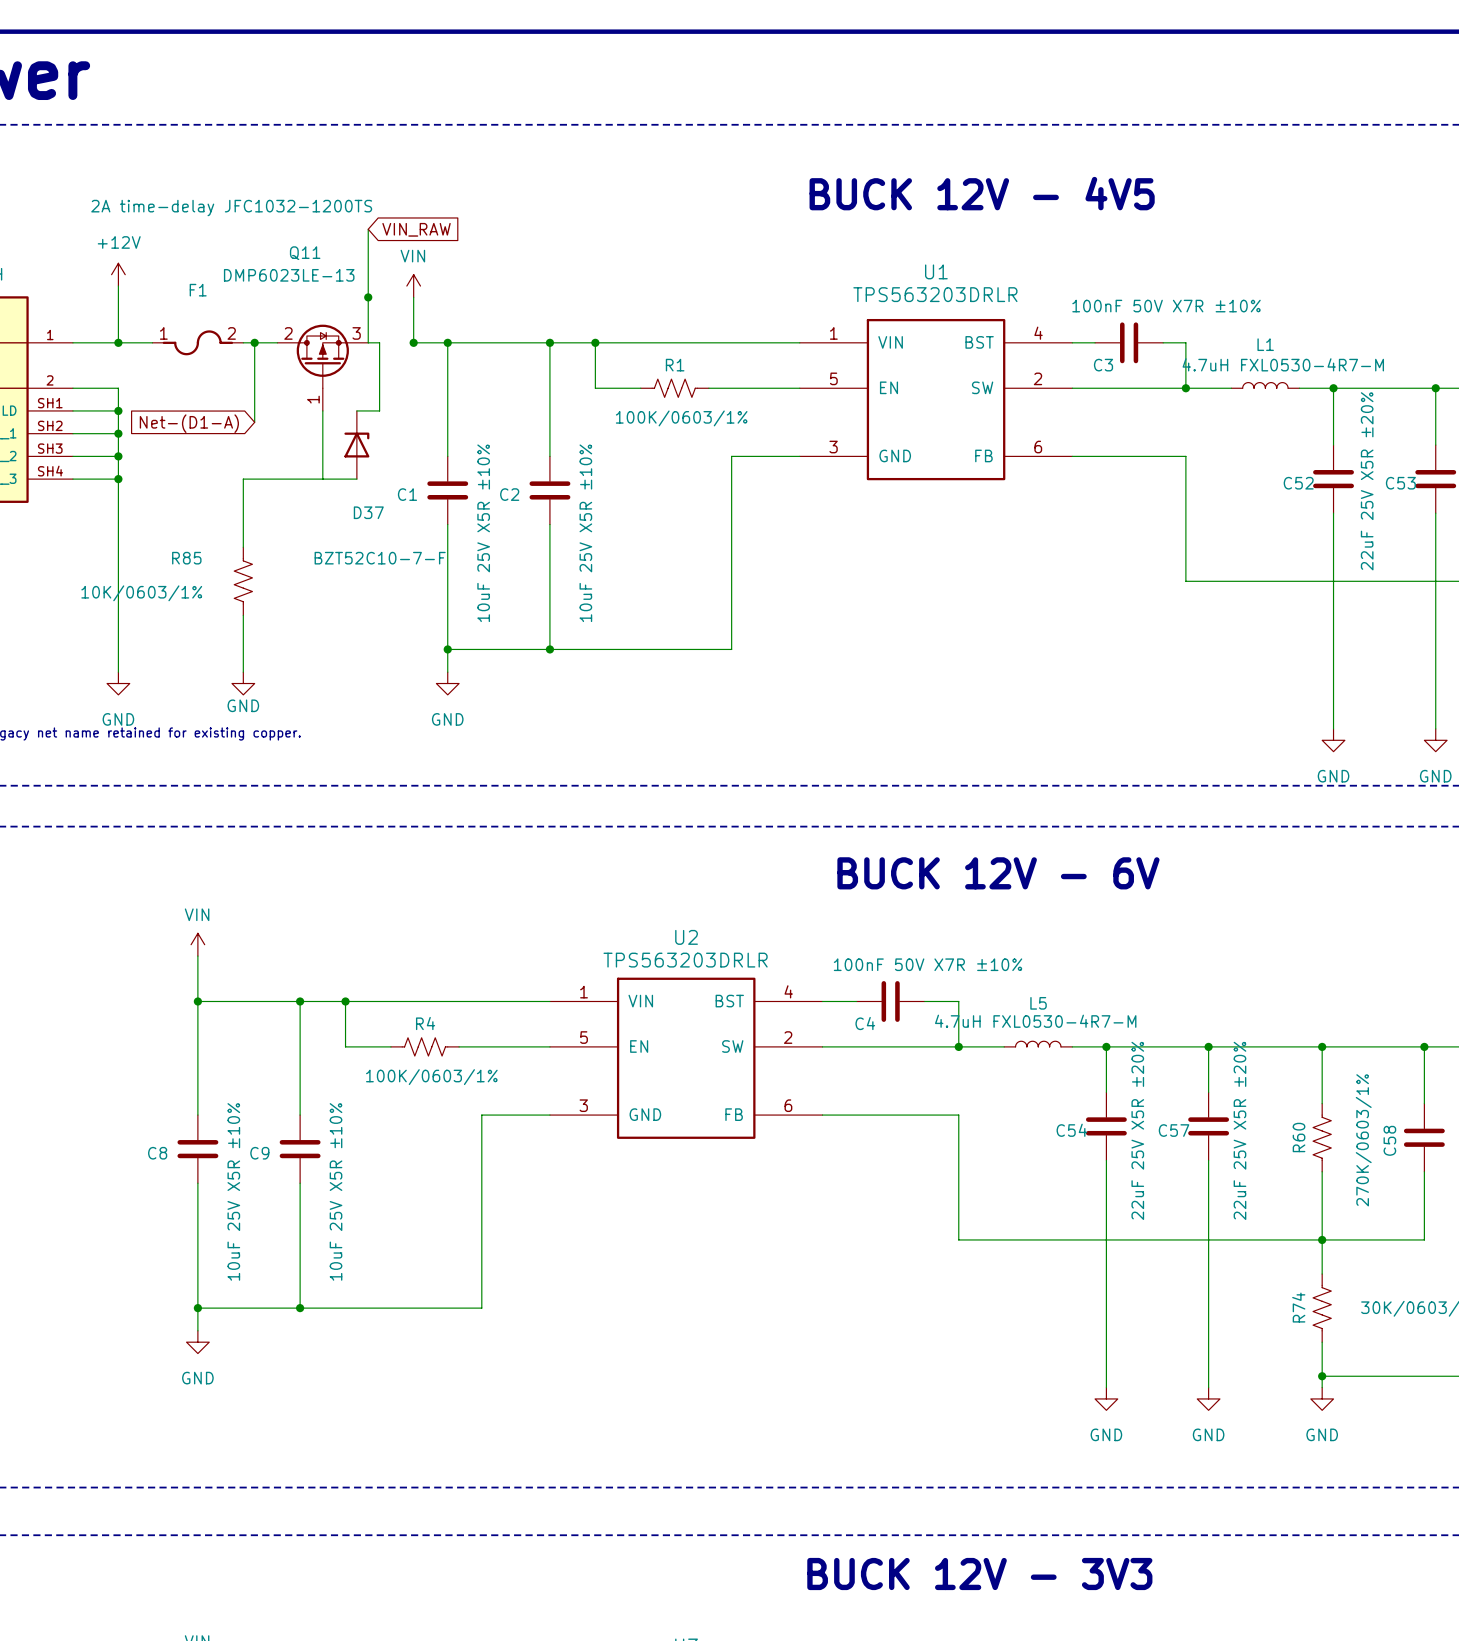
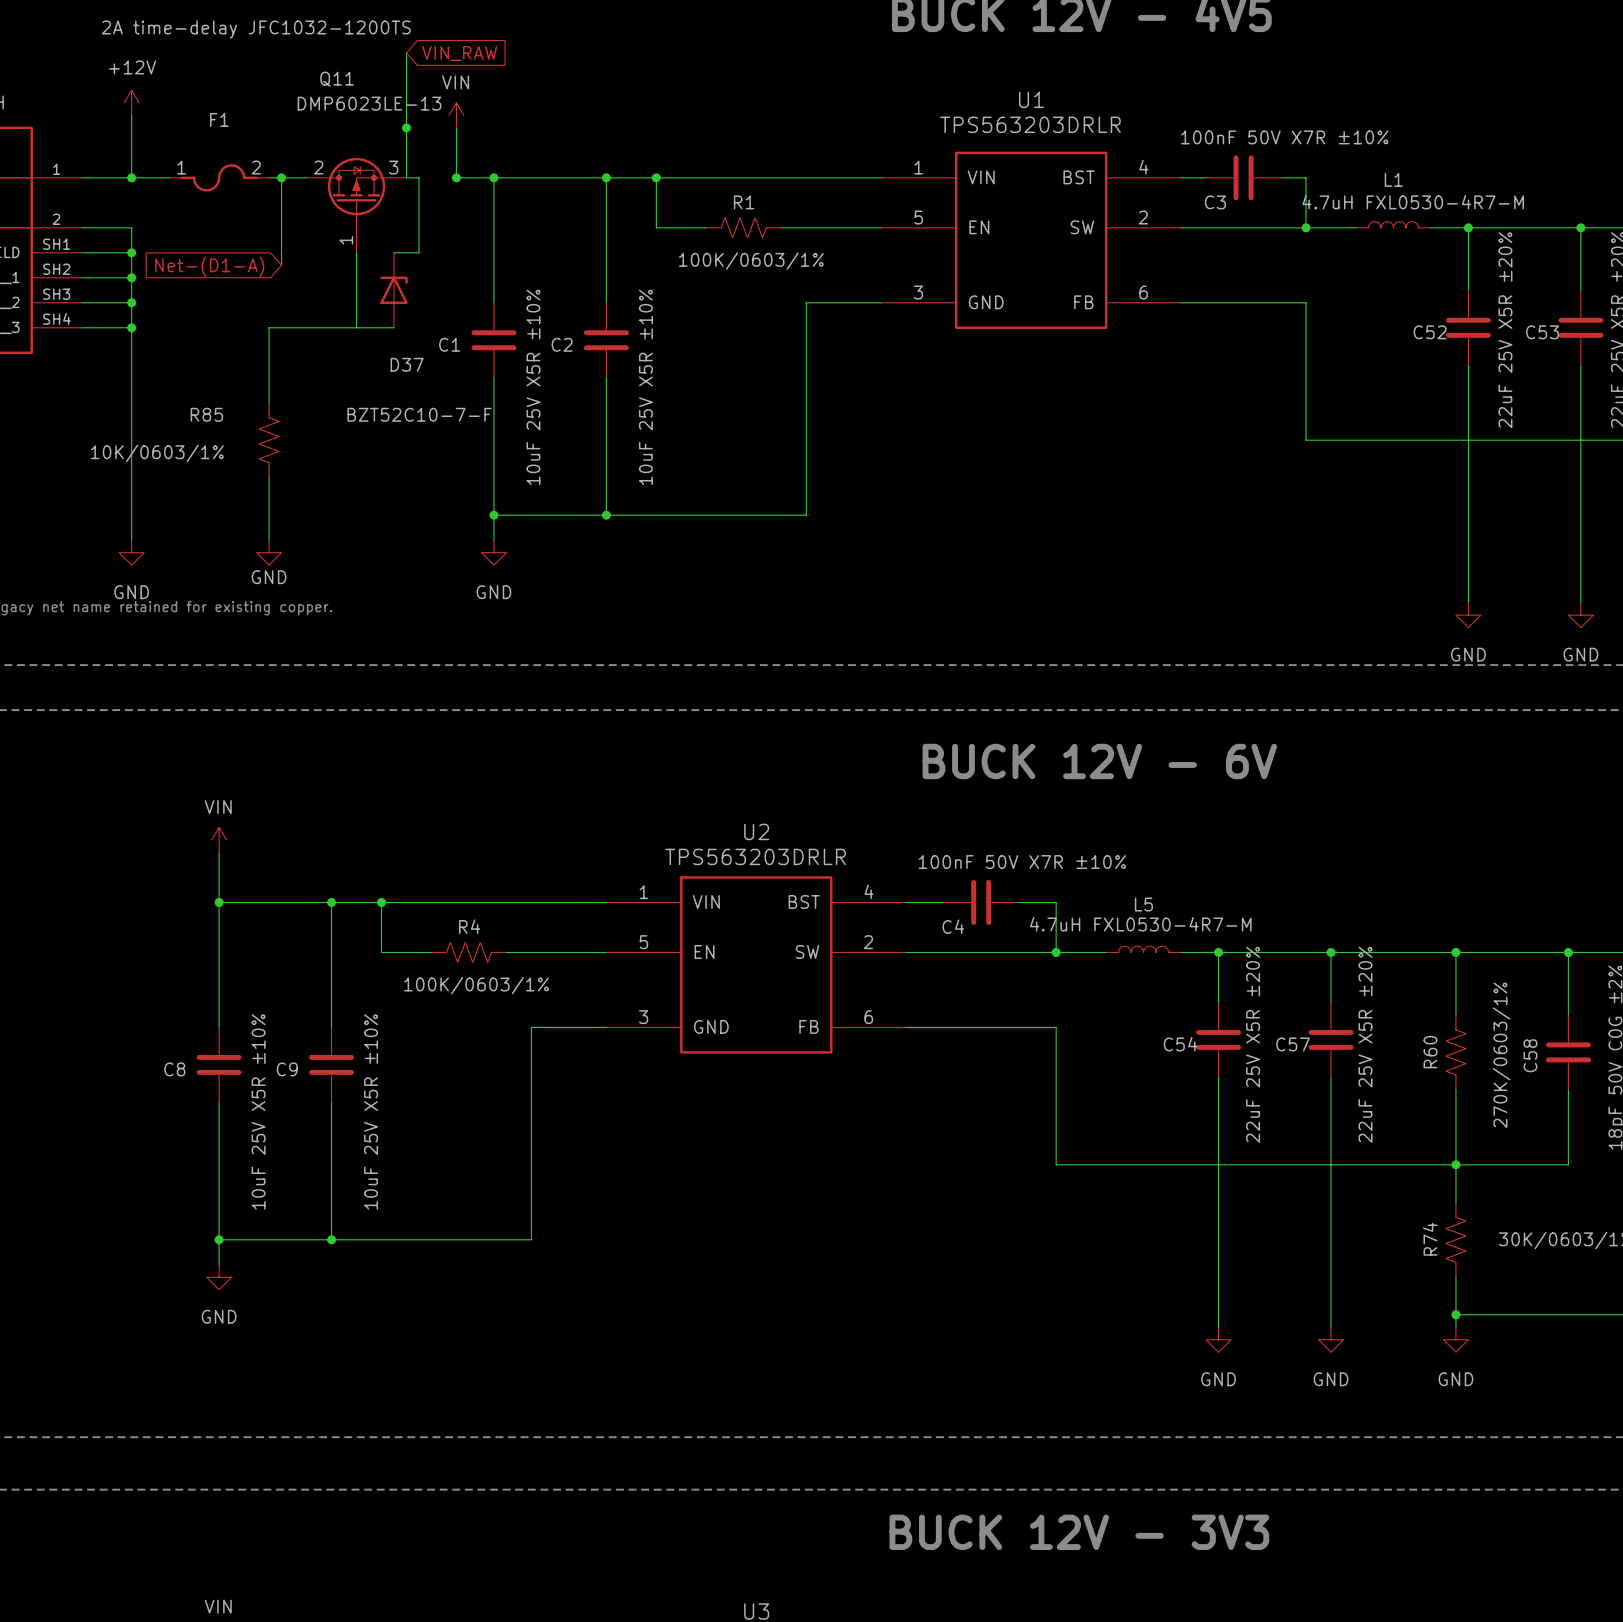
Q11 value position: DMP6023LE-13 (289, 275) -> DMP6023LE-13 (369, 103)

